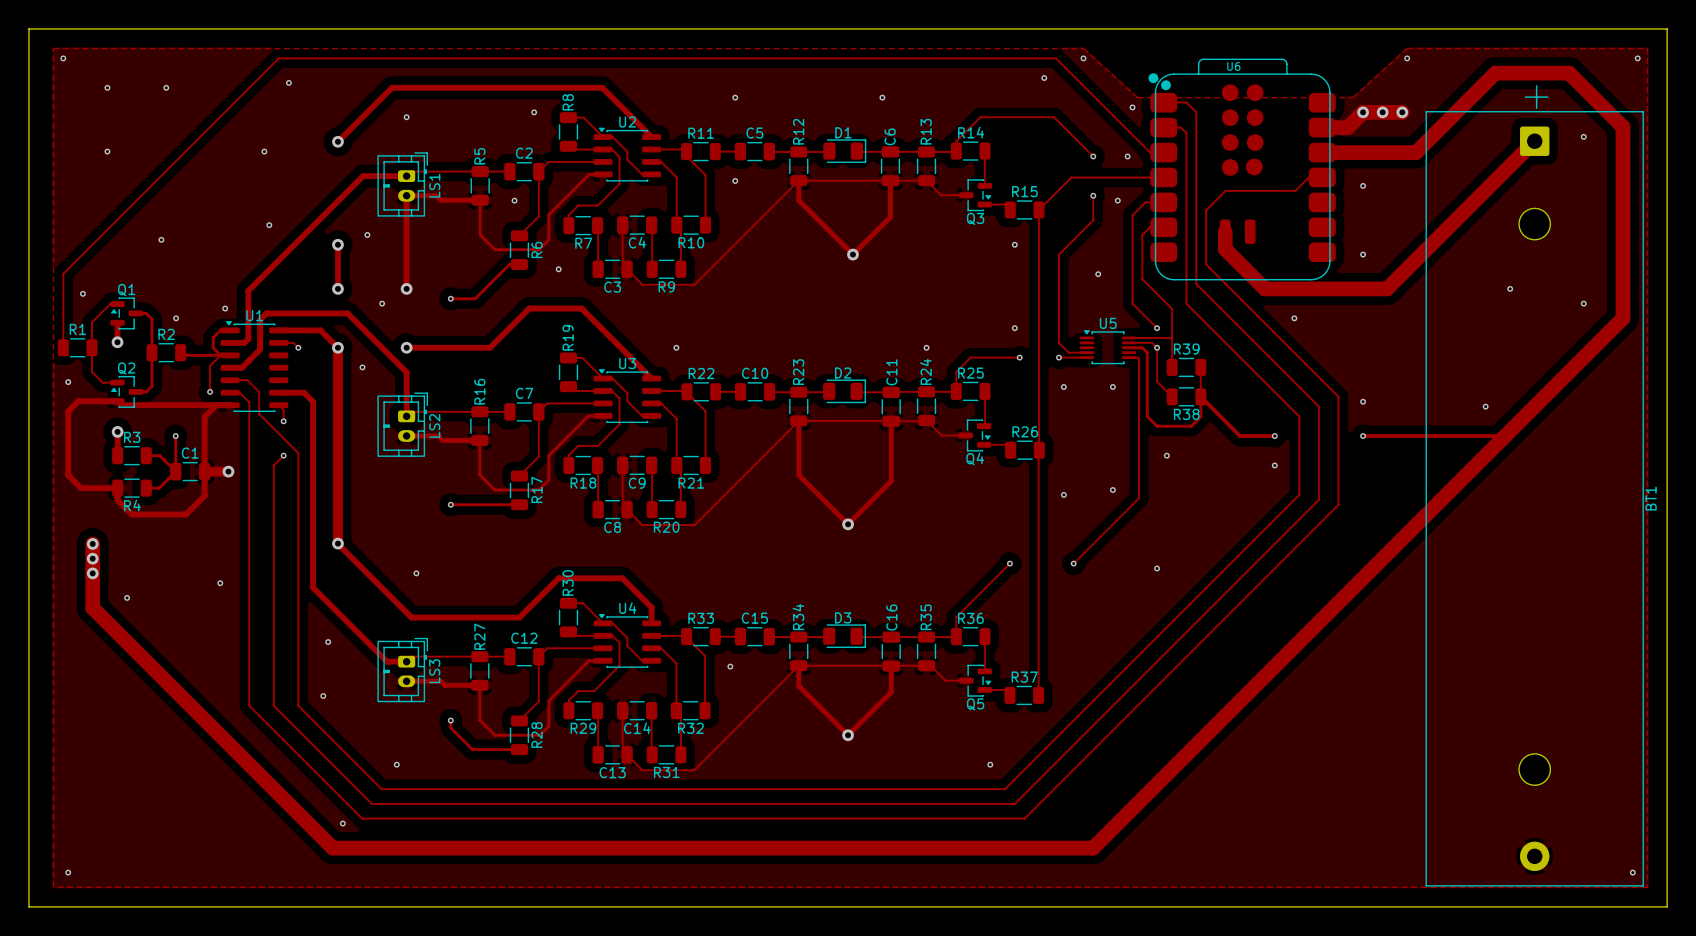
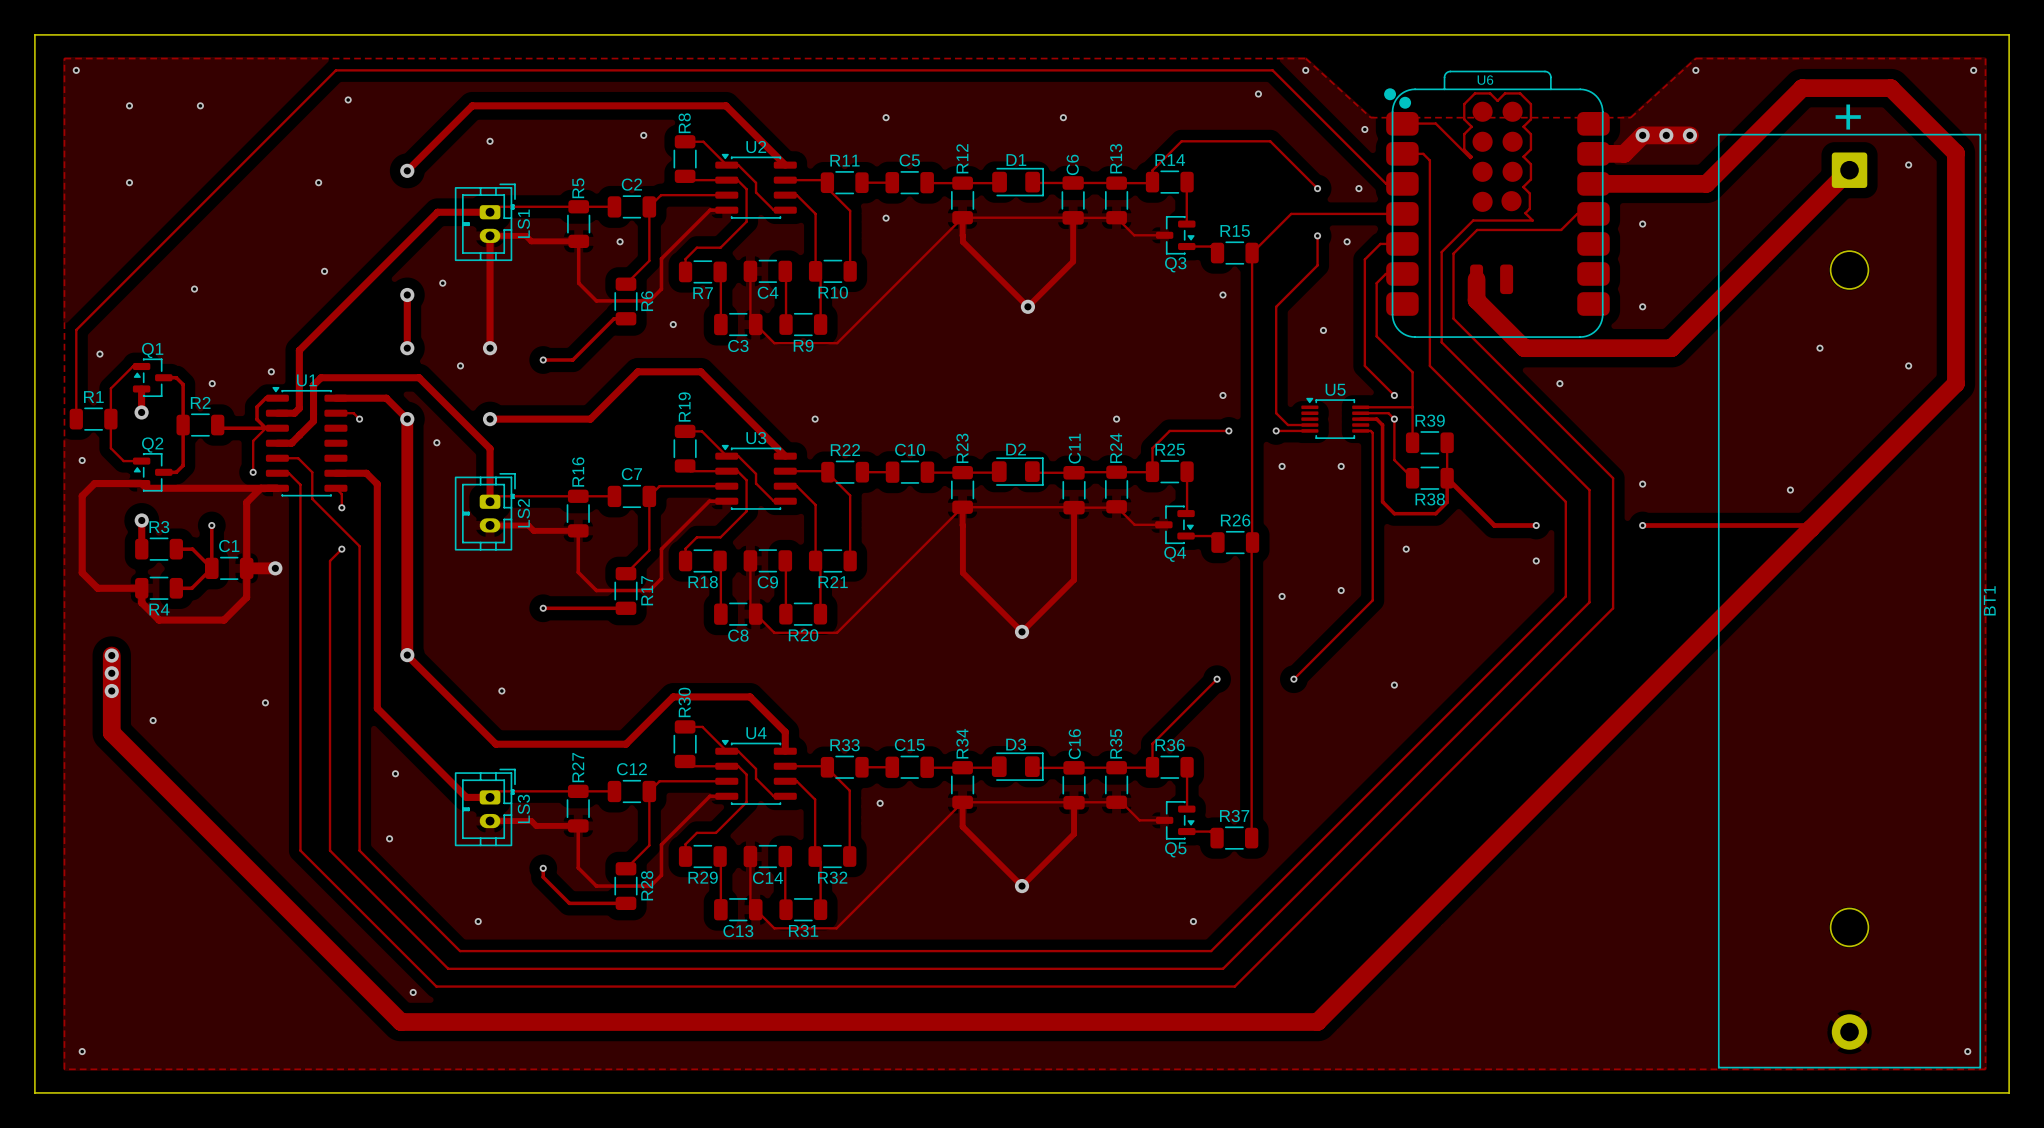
track: (1186, 102) (1196, 112) (1196, 209) -> (1429, 123) (1435, 123) (1470, 158) (1471, 156) (1464, 149) (1464, 134) (1471, 126) (1464, 119) (1464, 104) (1475, 93) (1490, 93) (1497, 100) (1505, 93) (1520, 93) (1530, 104) (1530, 119) (1523, 126) (1530, 134) (1530, 149) (1523, 156) (1530, 164) (1530, 179) (1523, 187) (1529, 193) (1529, 208) (1525, 213) (1532, 220) (1473, 220) (1441, 252)

